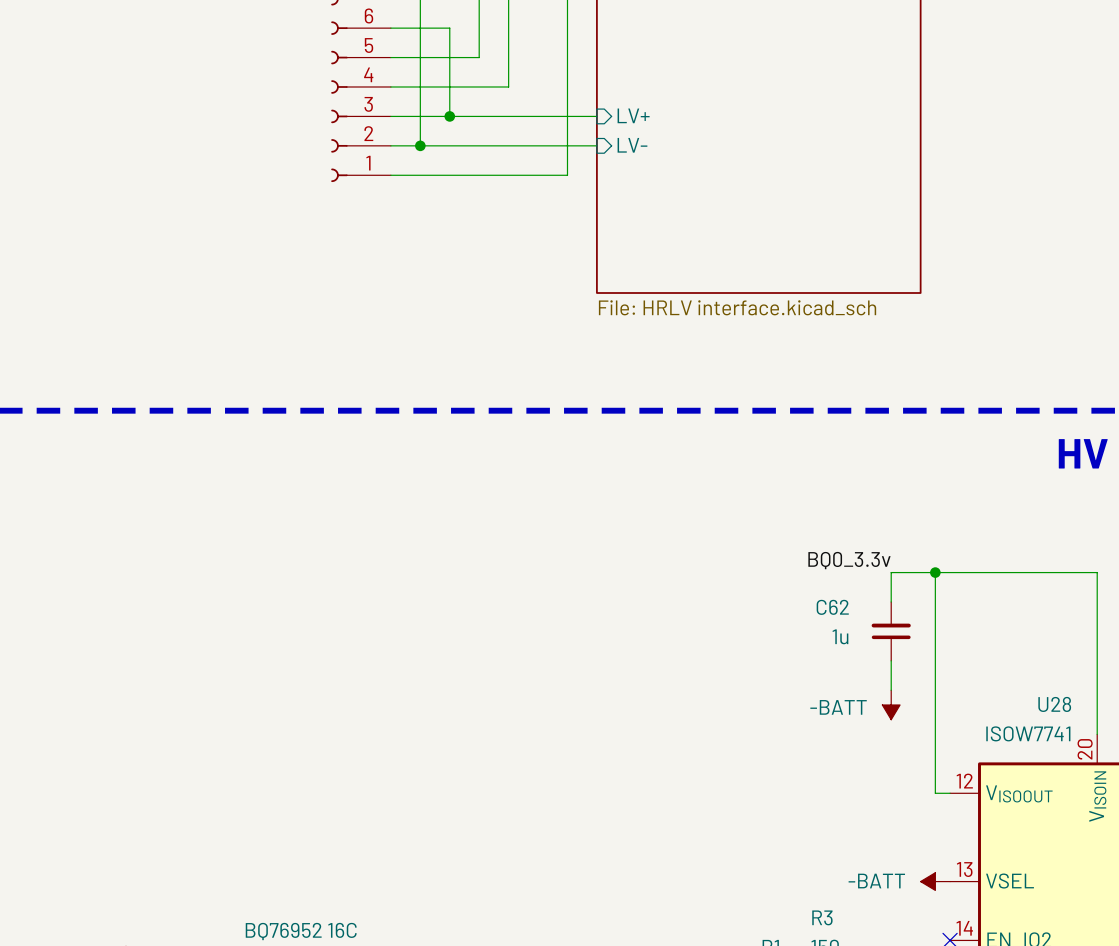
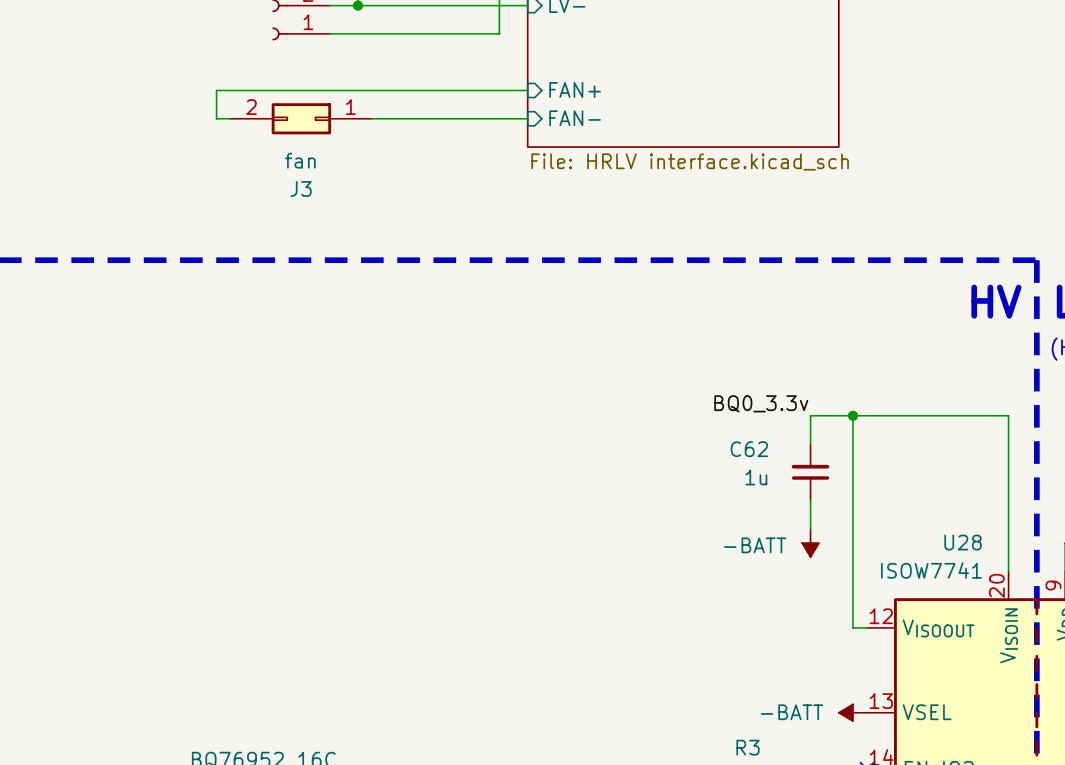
sheet pin: none -> FAN+ (575, 89)
wire: none -> (527, 90) (216, 90) (216, 118) (230, 118)
J3: none -> fan (301, 118)
wire: none -> (372, 118) (527, 118)
sheet pin: none -> FAN- (575, 118)

